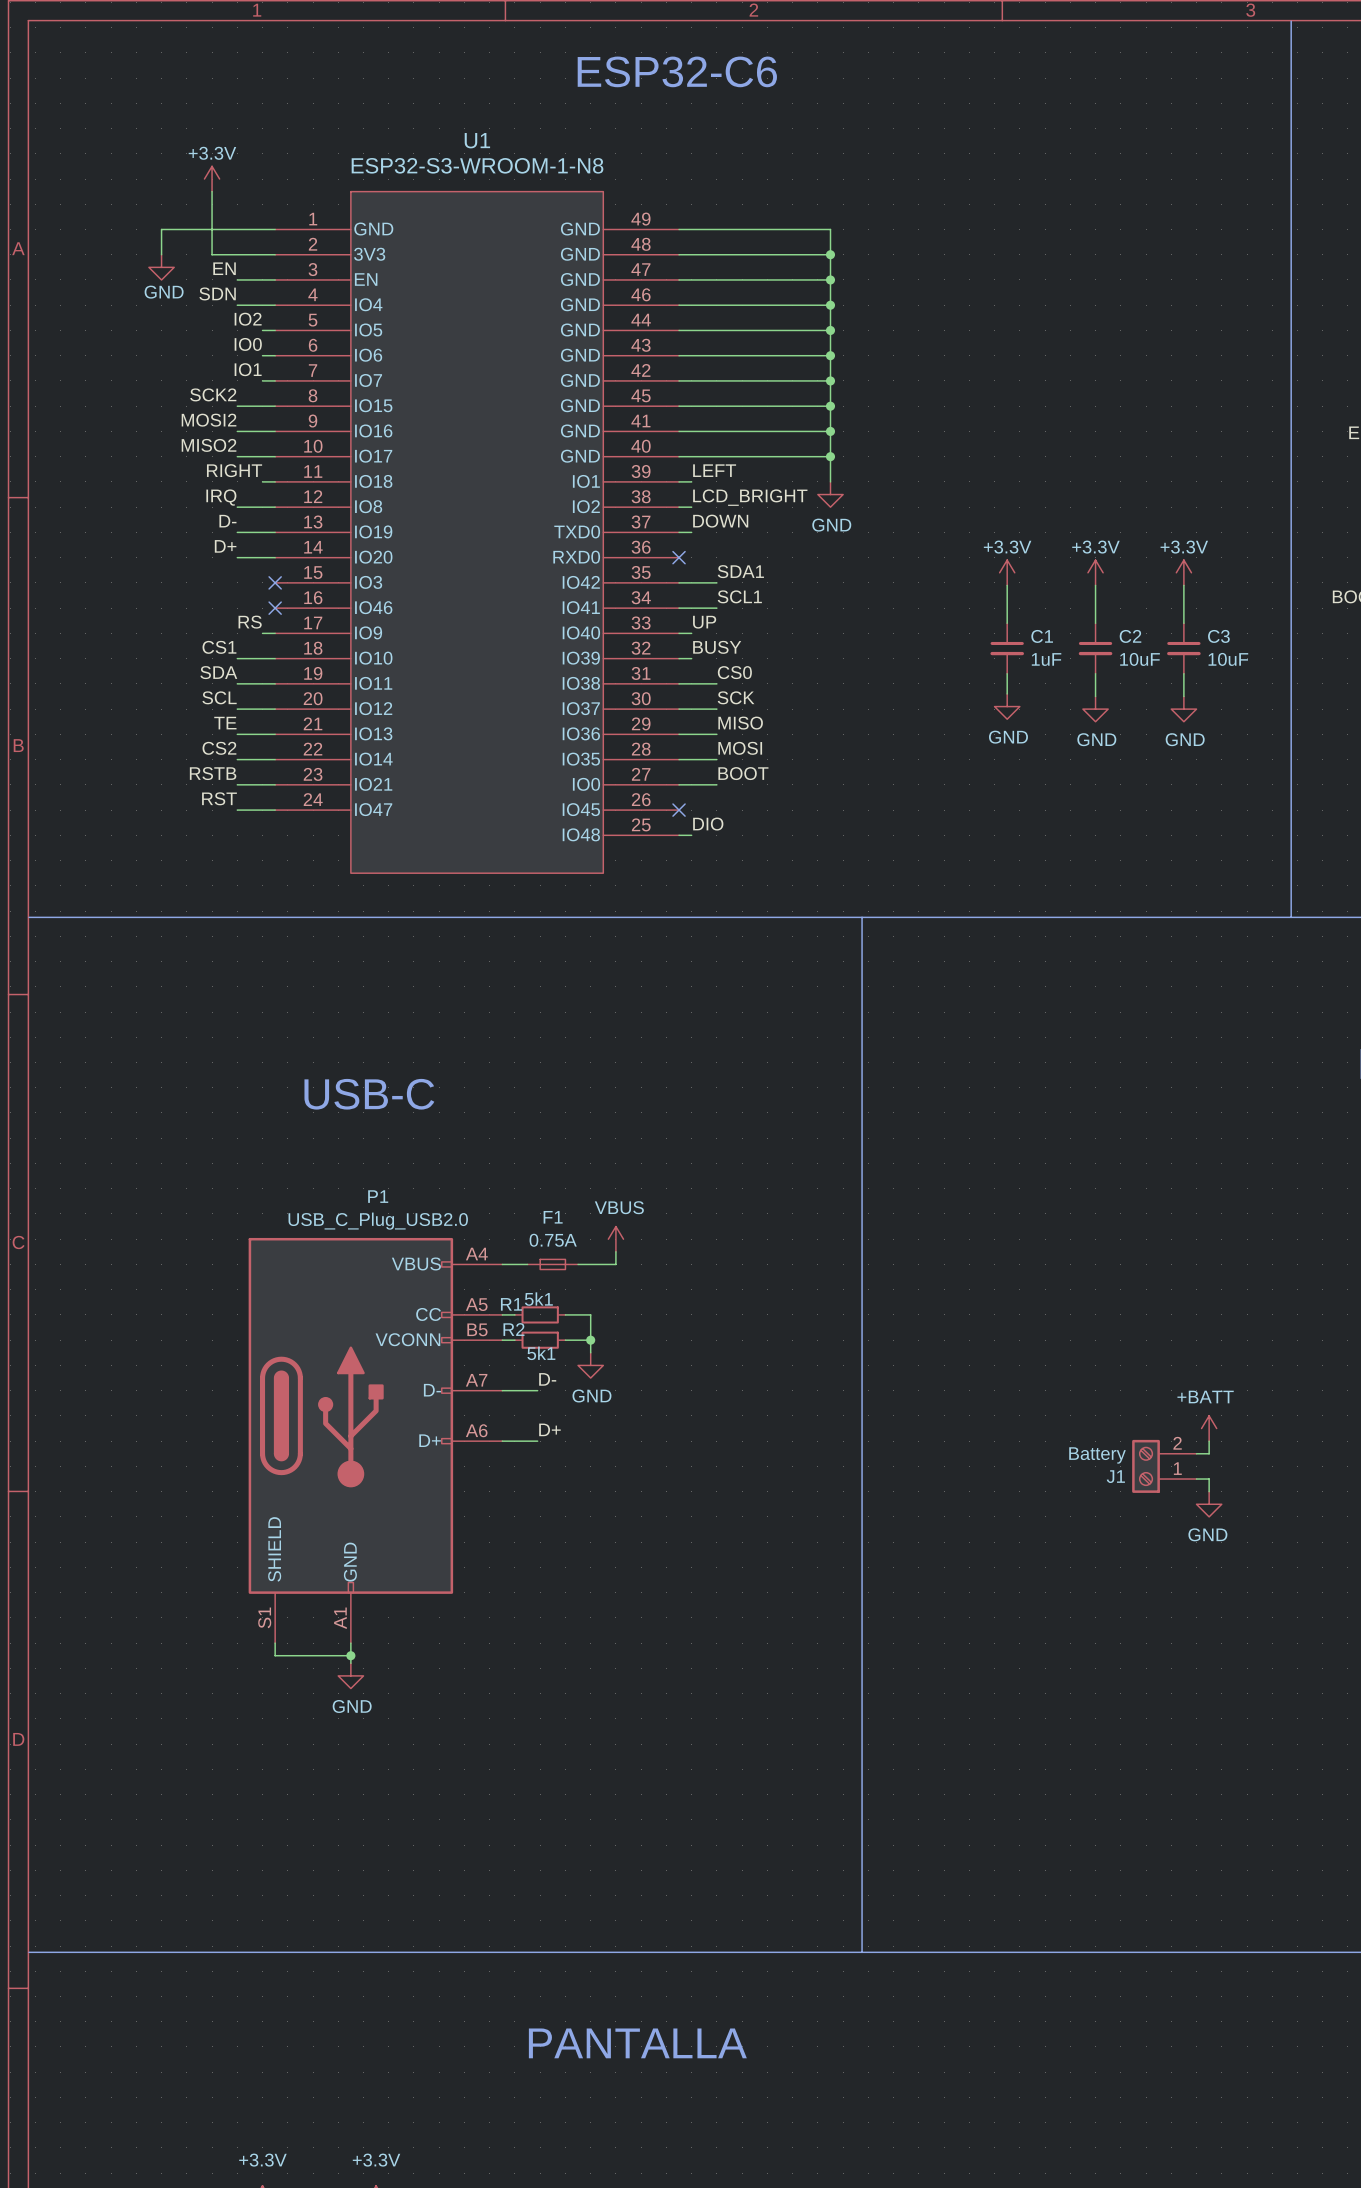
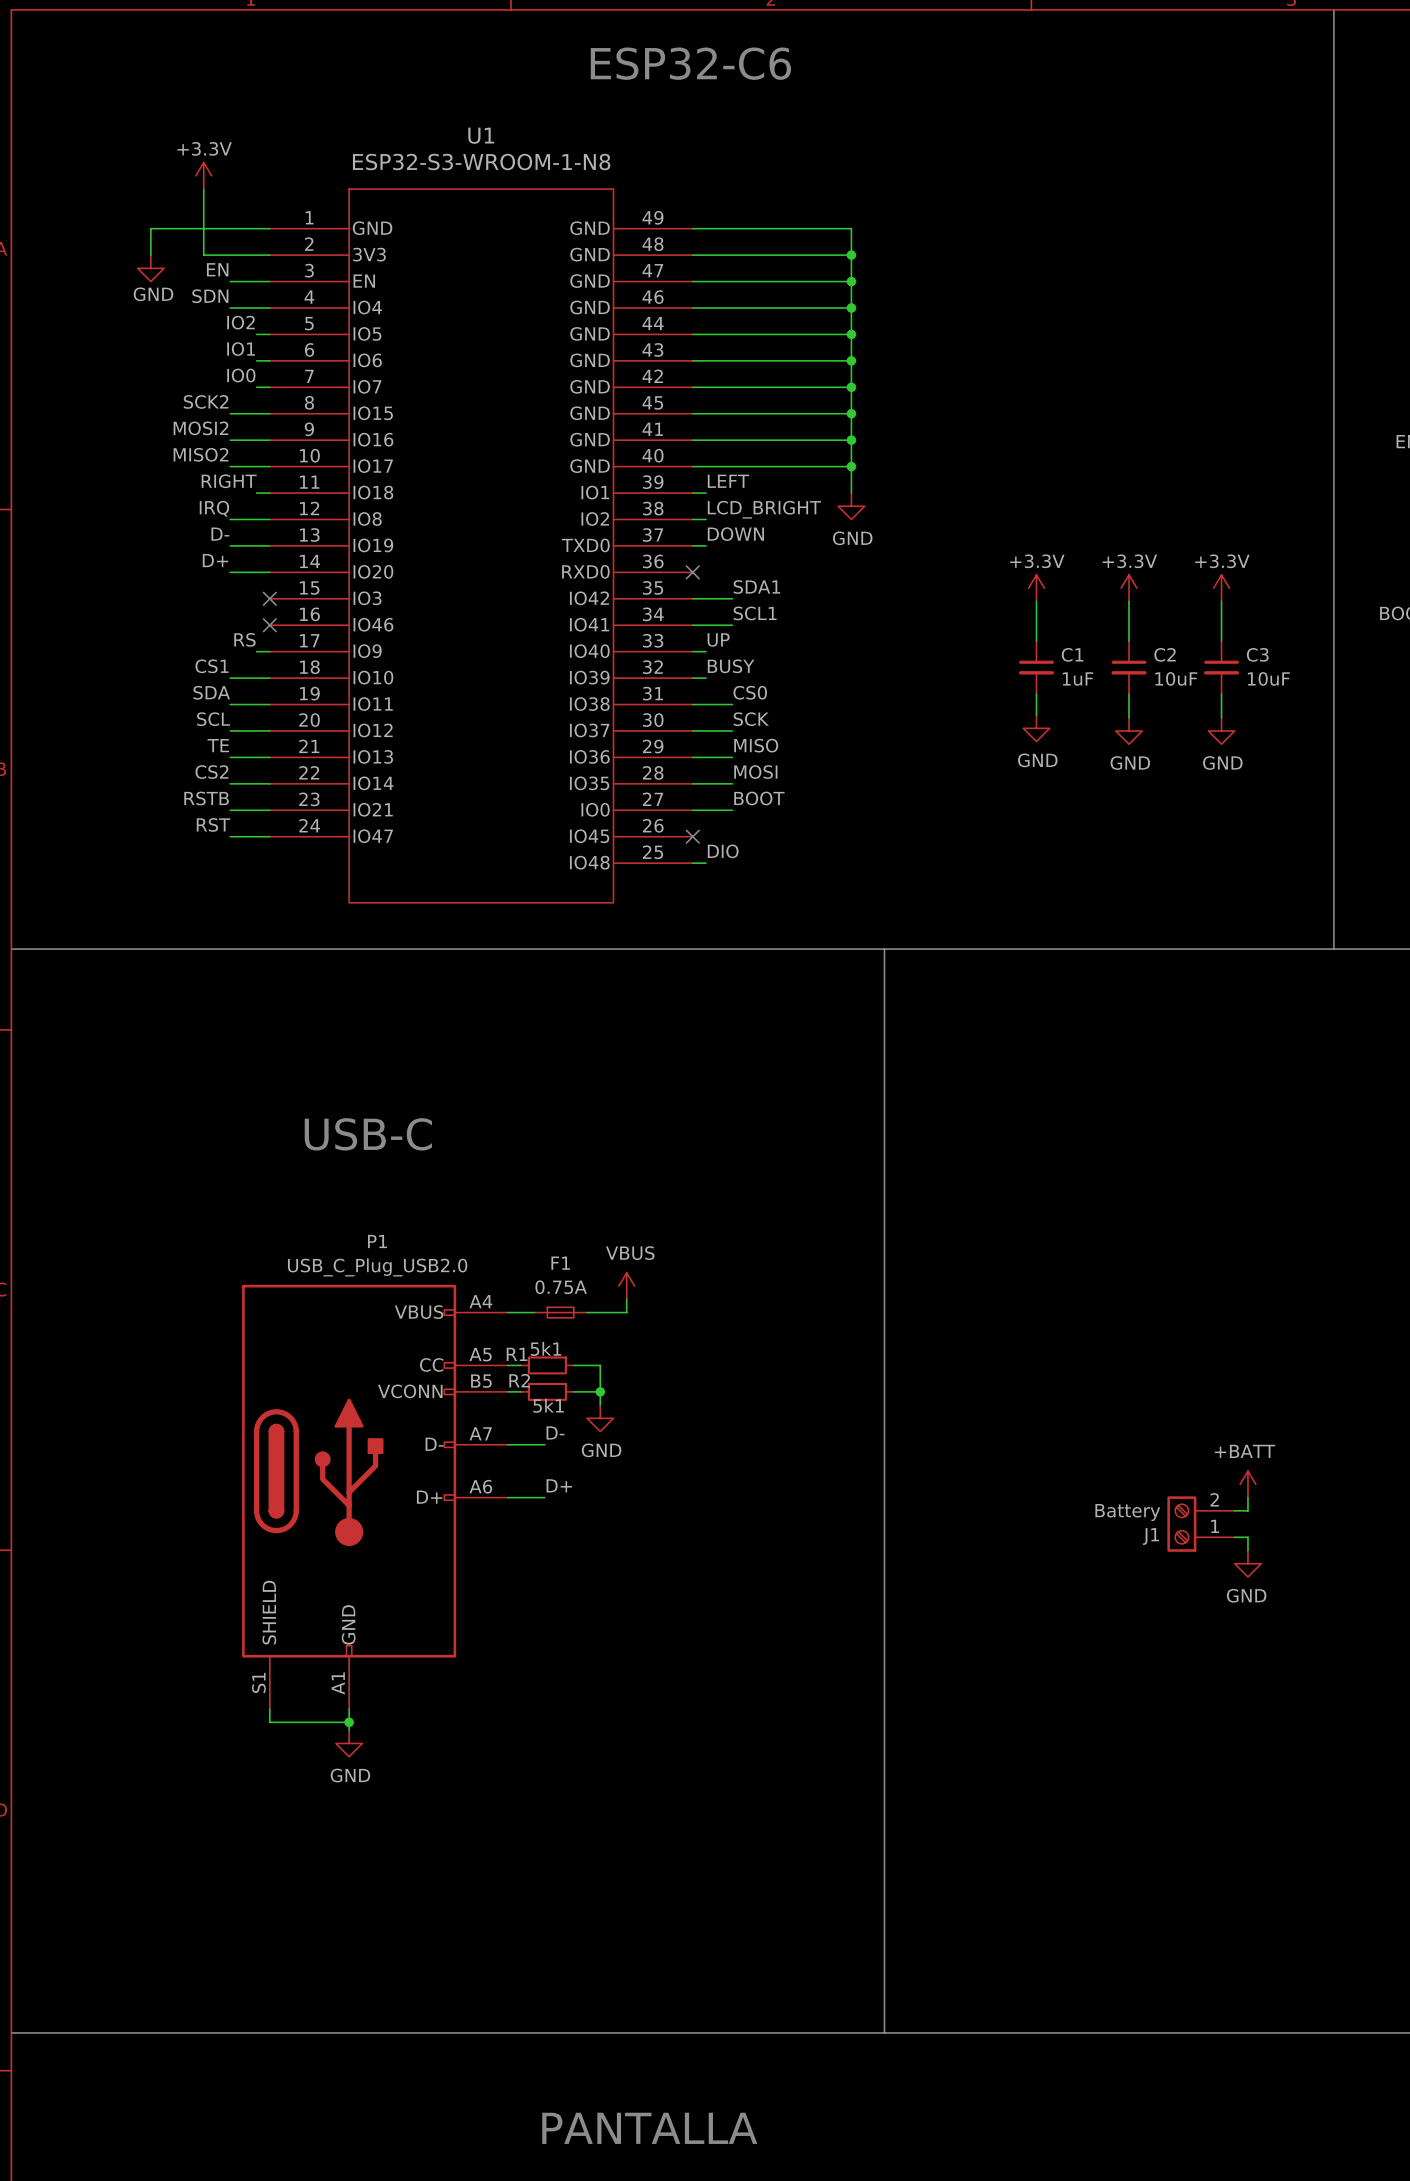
label: IO0 (248, 344) -> IO1 (241, 349)
label: IO1 (248, 369) -> IO0 (241, 375)

